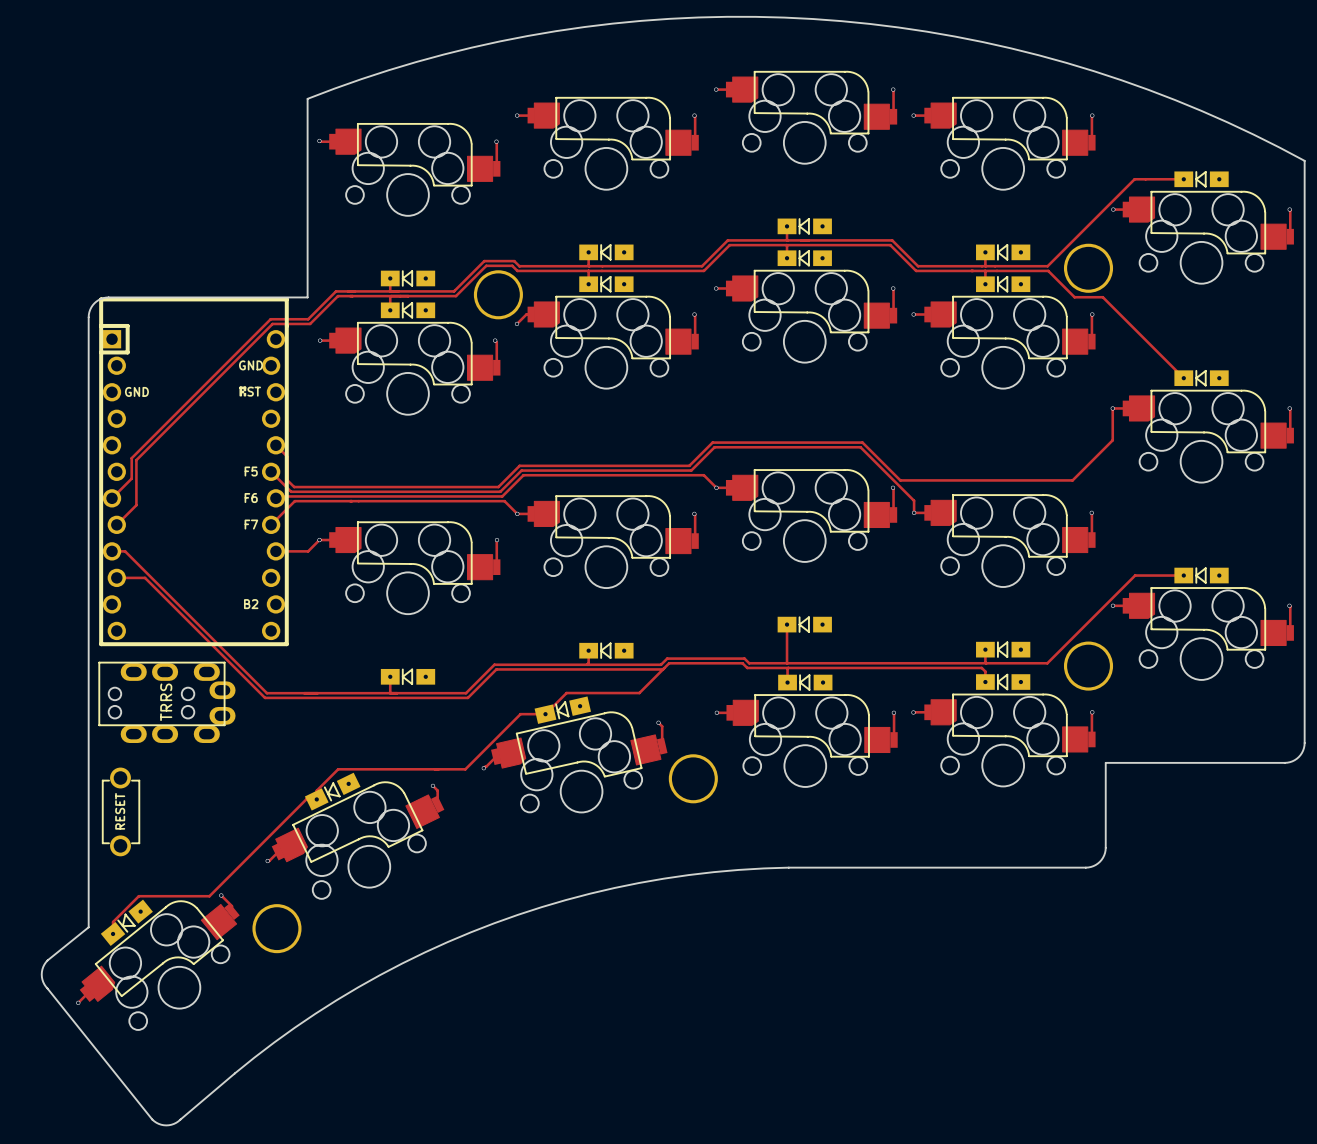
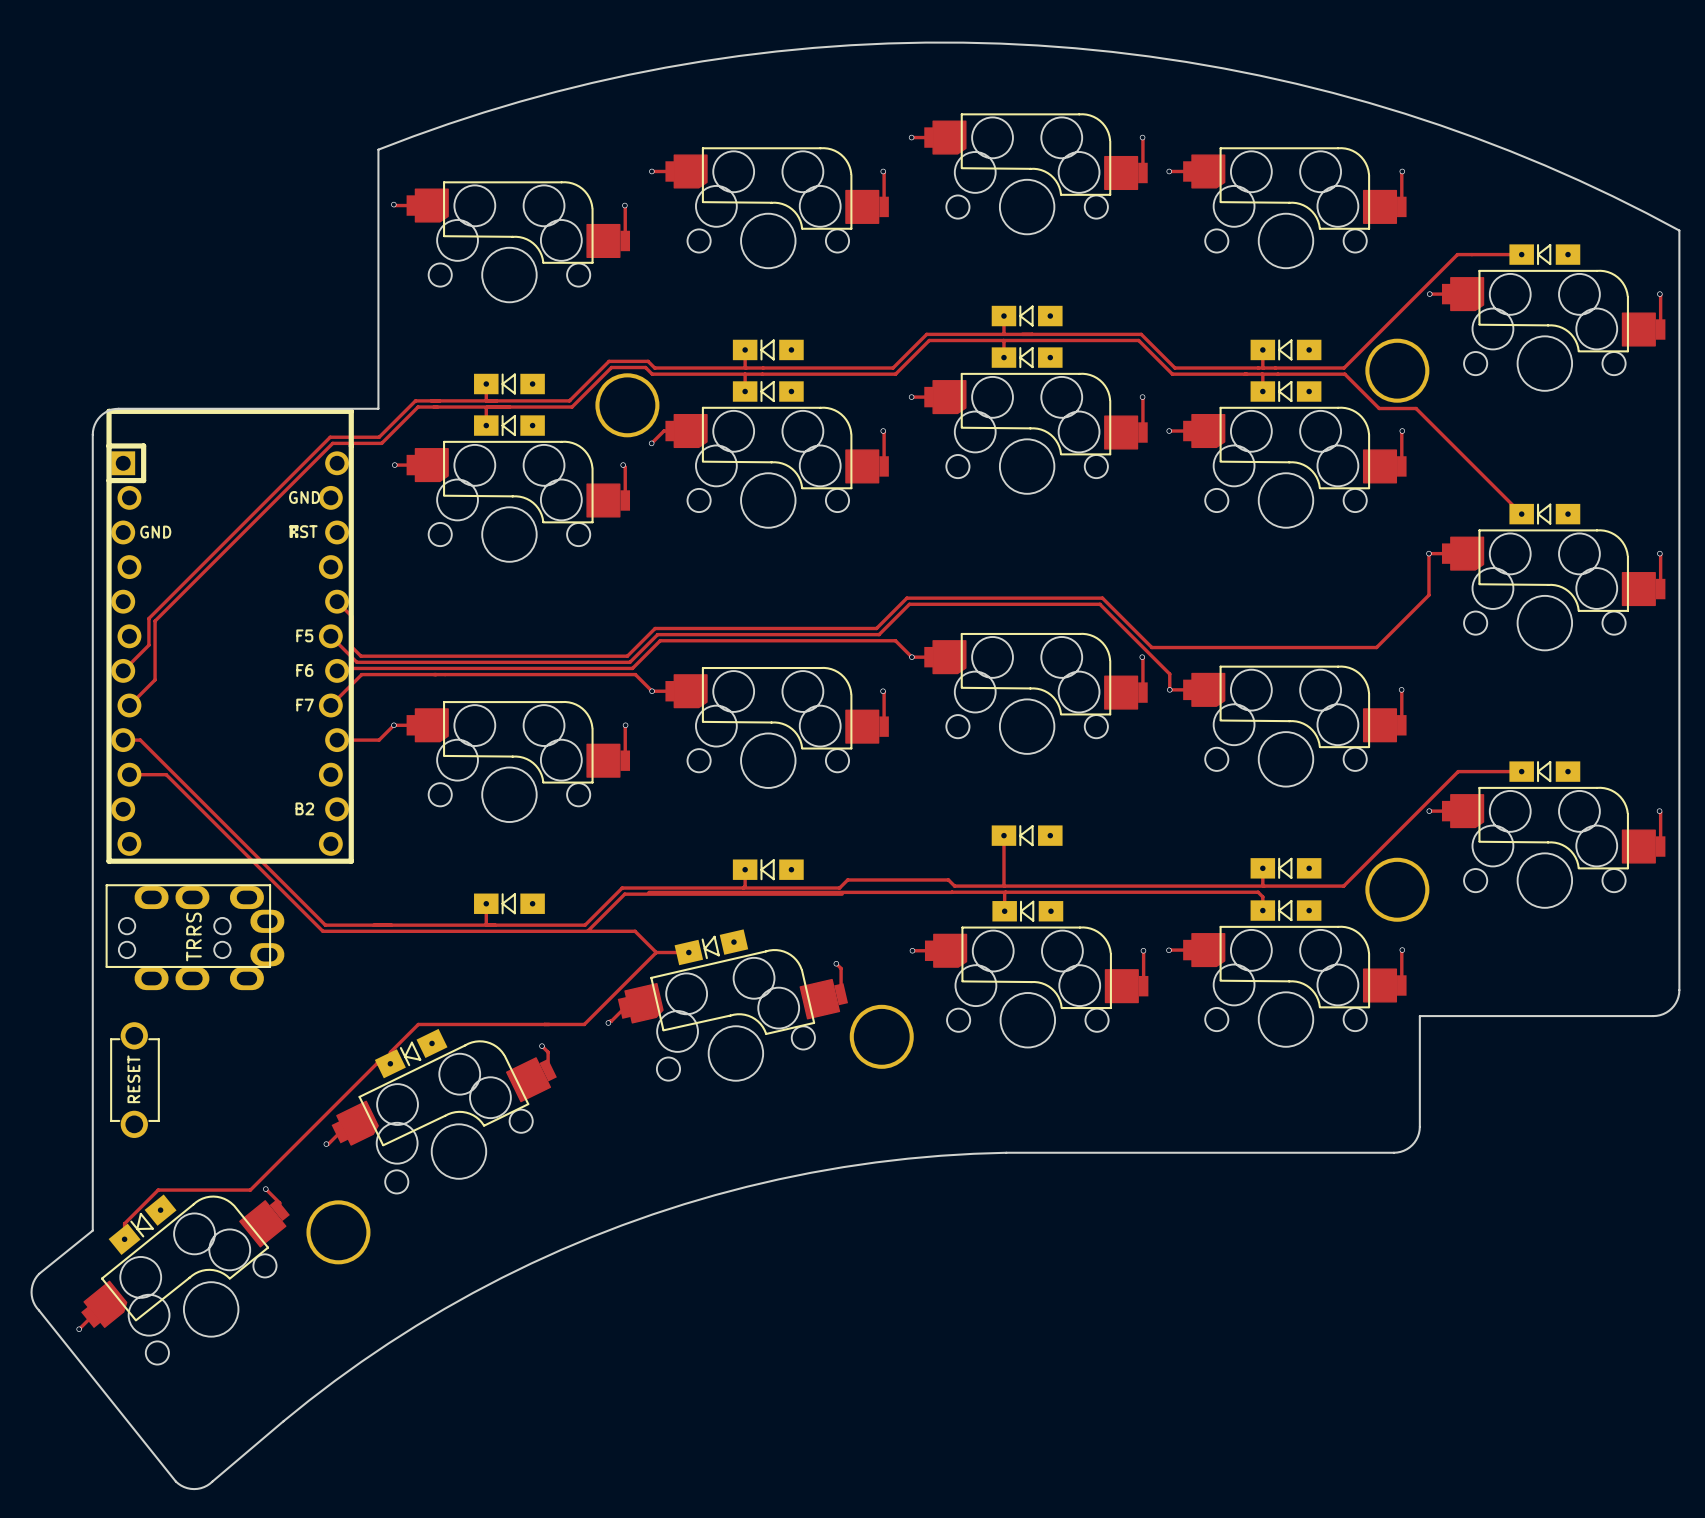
track: (747, 667) (742, 663) (669, 663) (639, 693) (566, 693) (545, 714) -> (951, 892) (649, 892)
track: none -> (587, 931) (635, 931) (656, 952)

